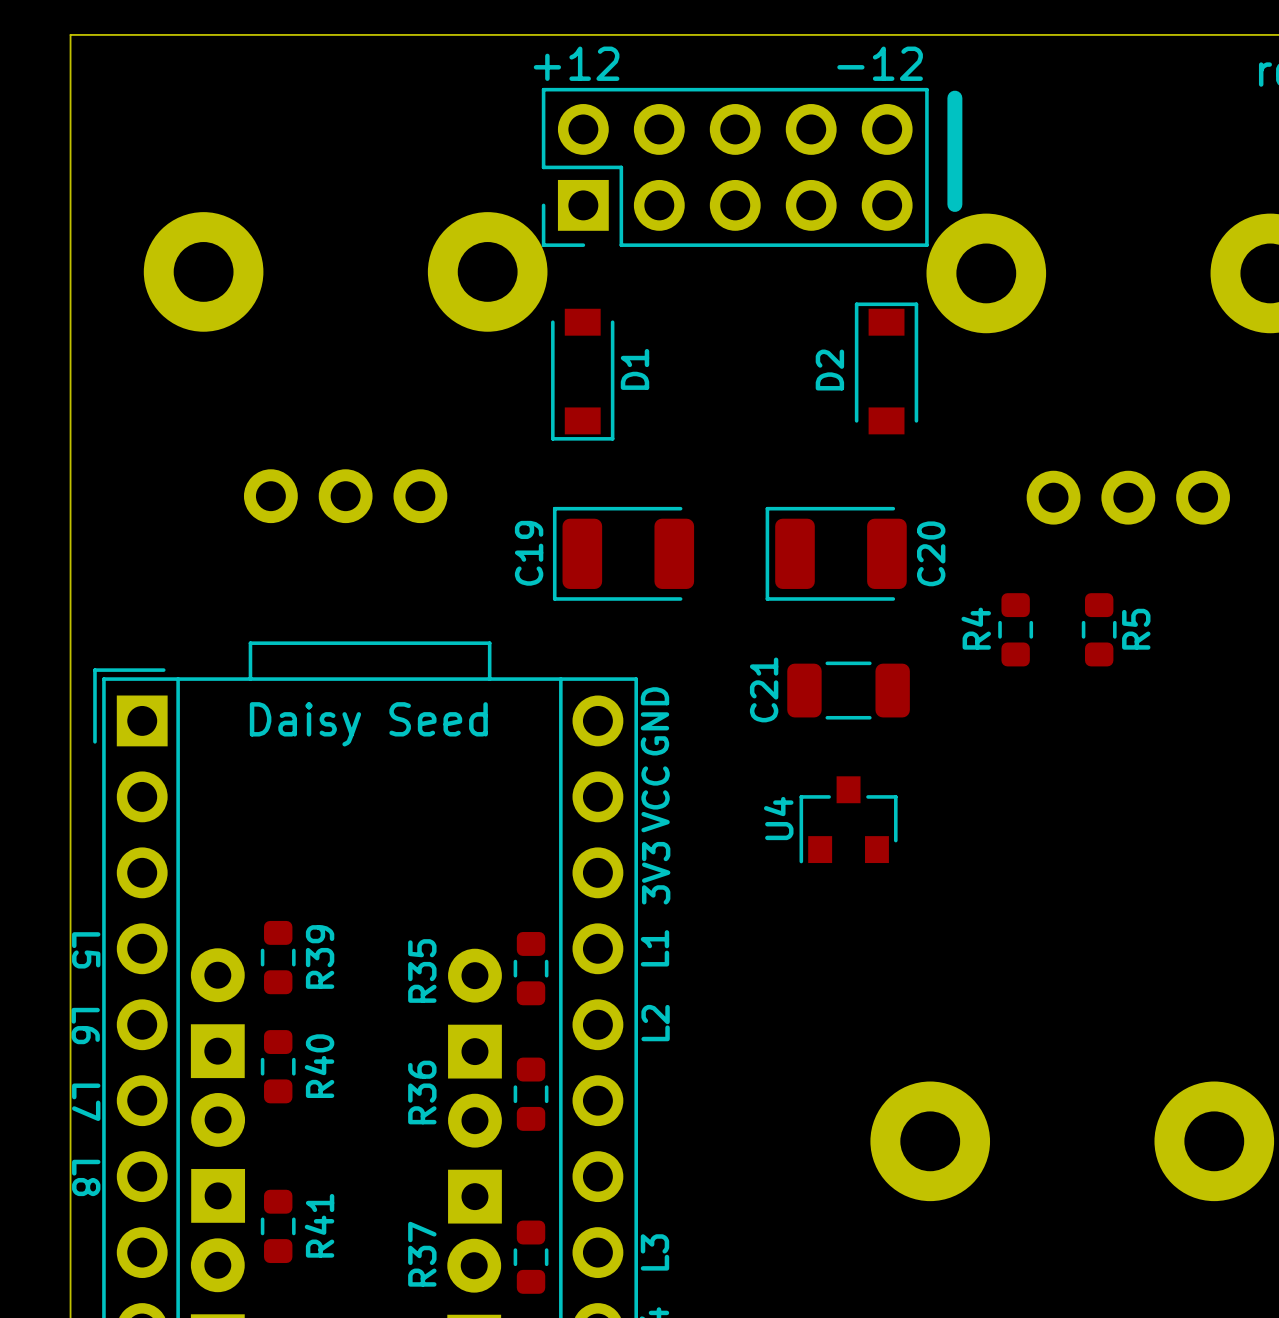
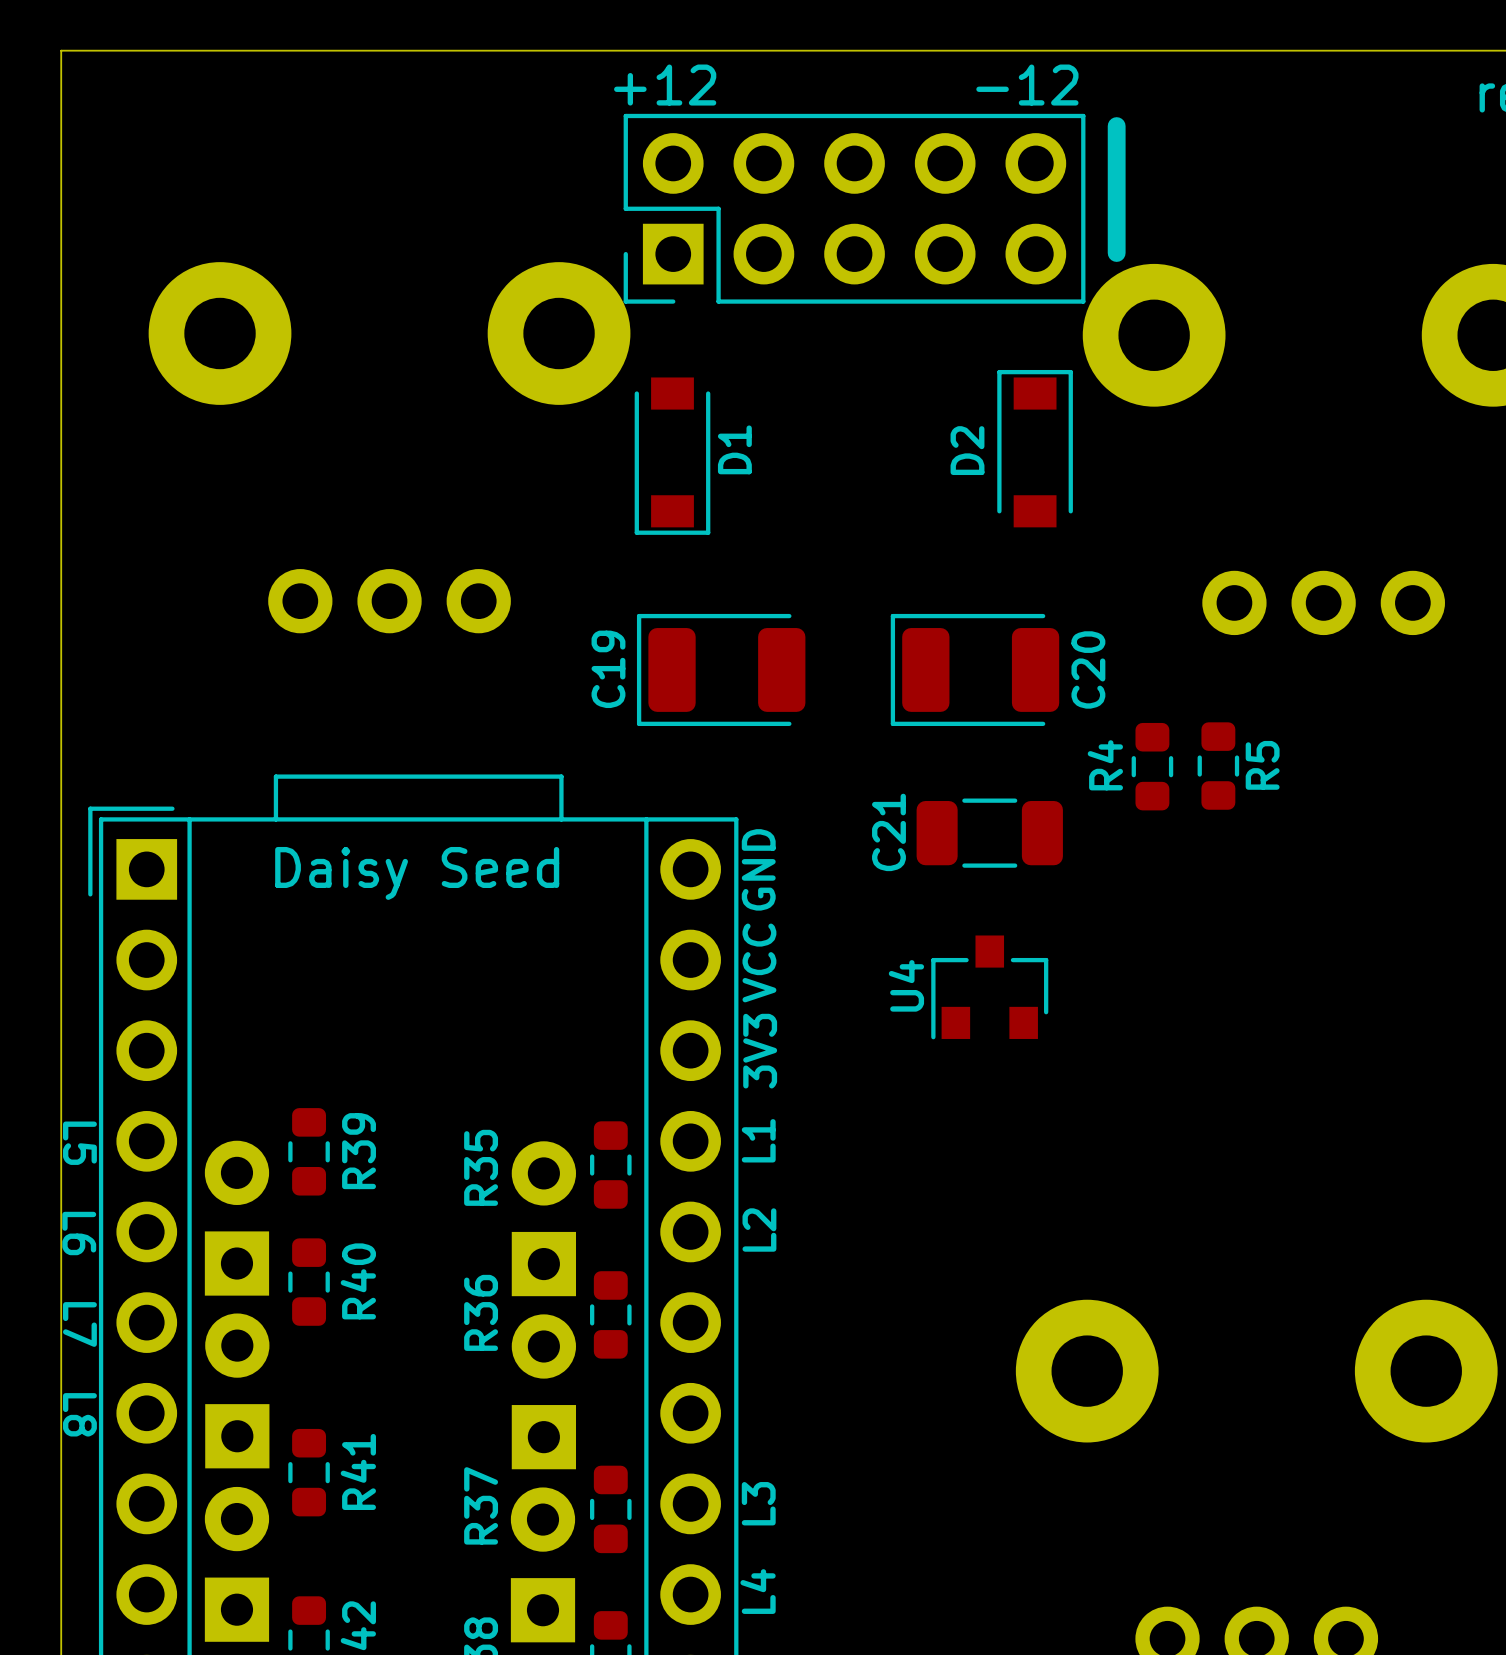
R4 position: (1015, 629) -> (1152, 766)
R5 position: (1099, 629) -> (1218, 766)

